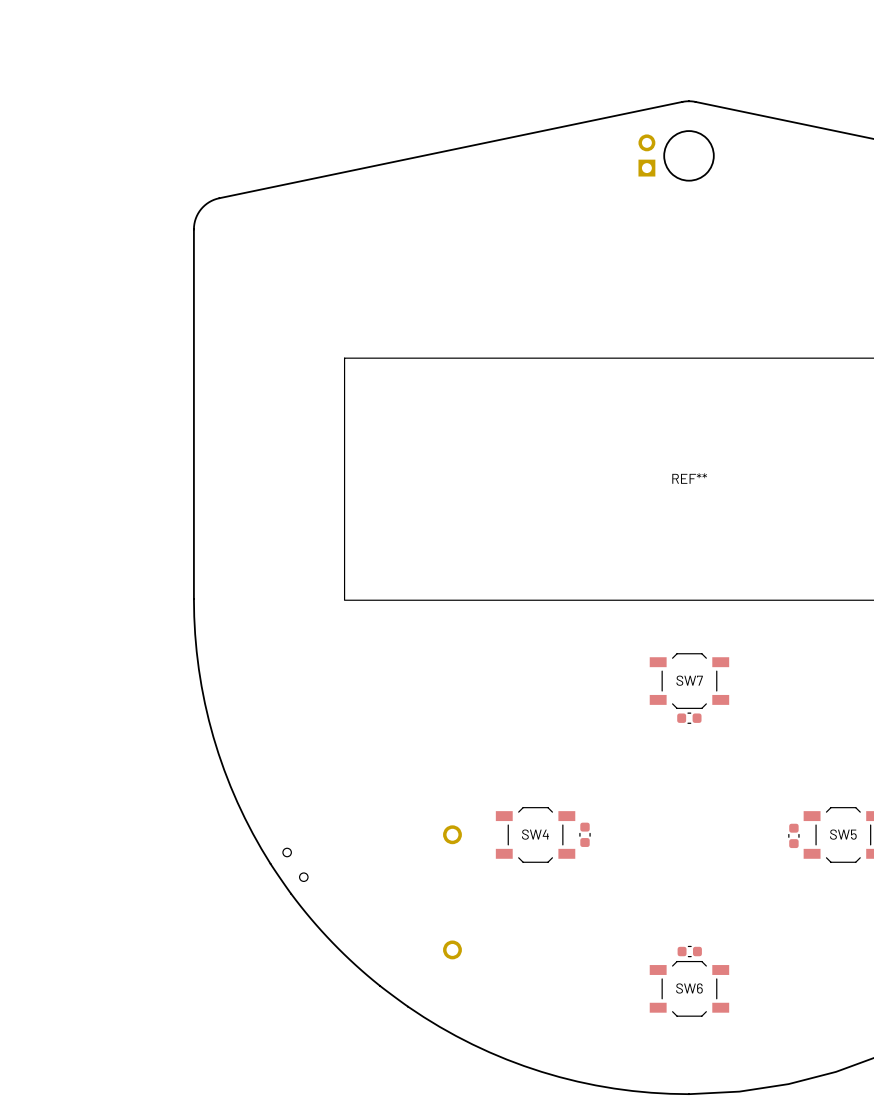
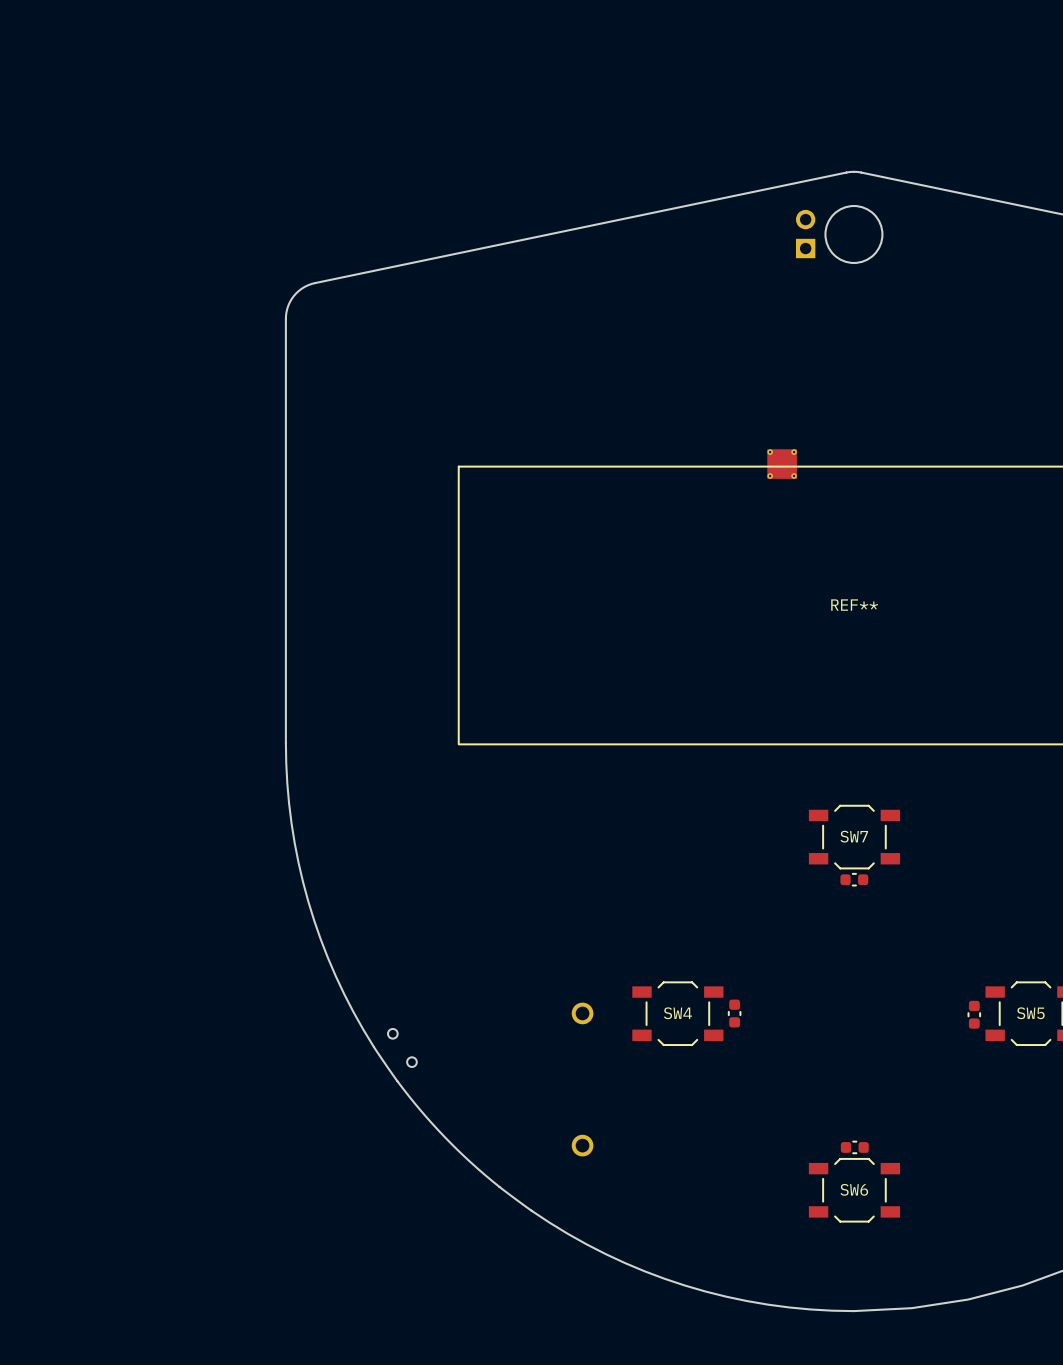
part: none -> (782, 464)

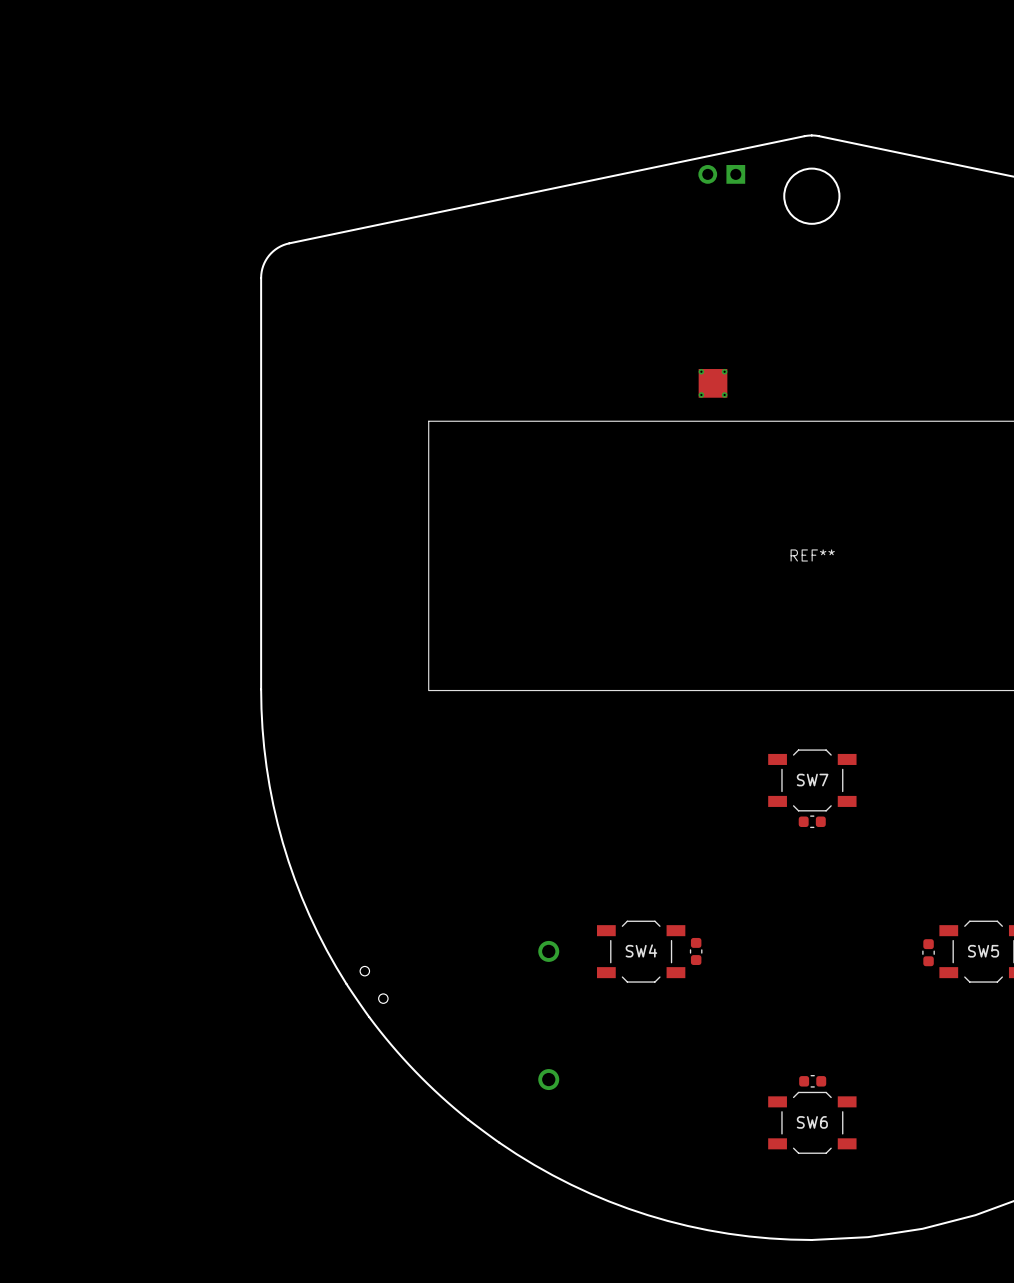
part rotation: 0° (805, 234) -> 90° counterclockwise (721, 174)
part position: (805, 234) -> (721, 174)
part position: (782, 464) -> (713, 383)

